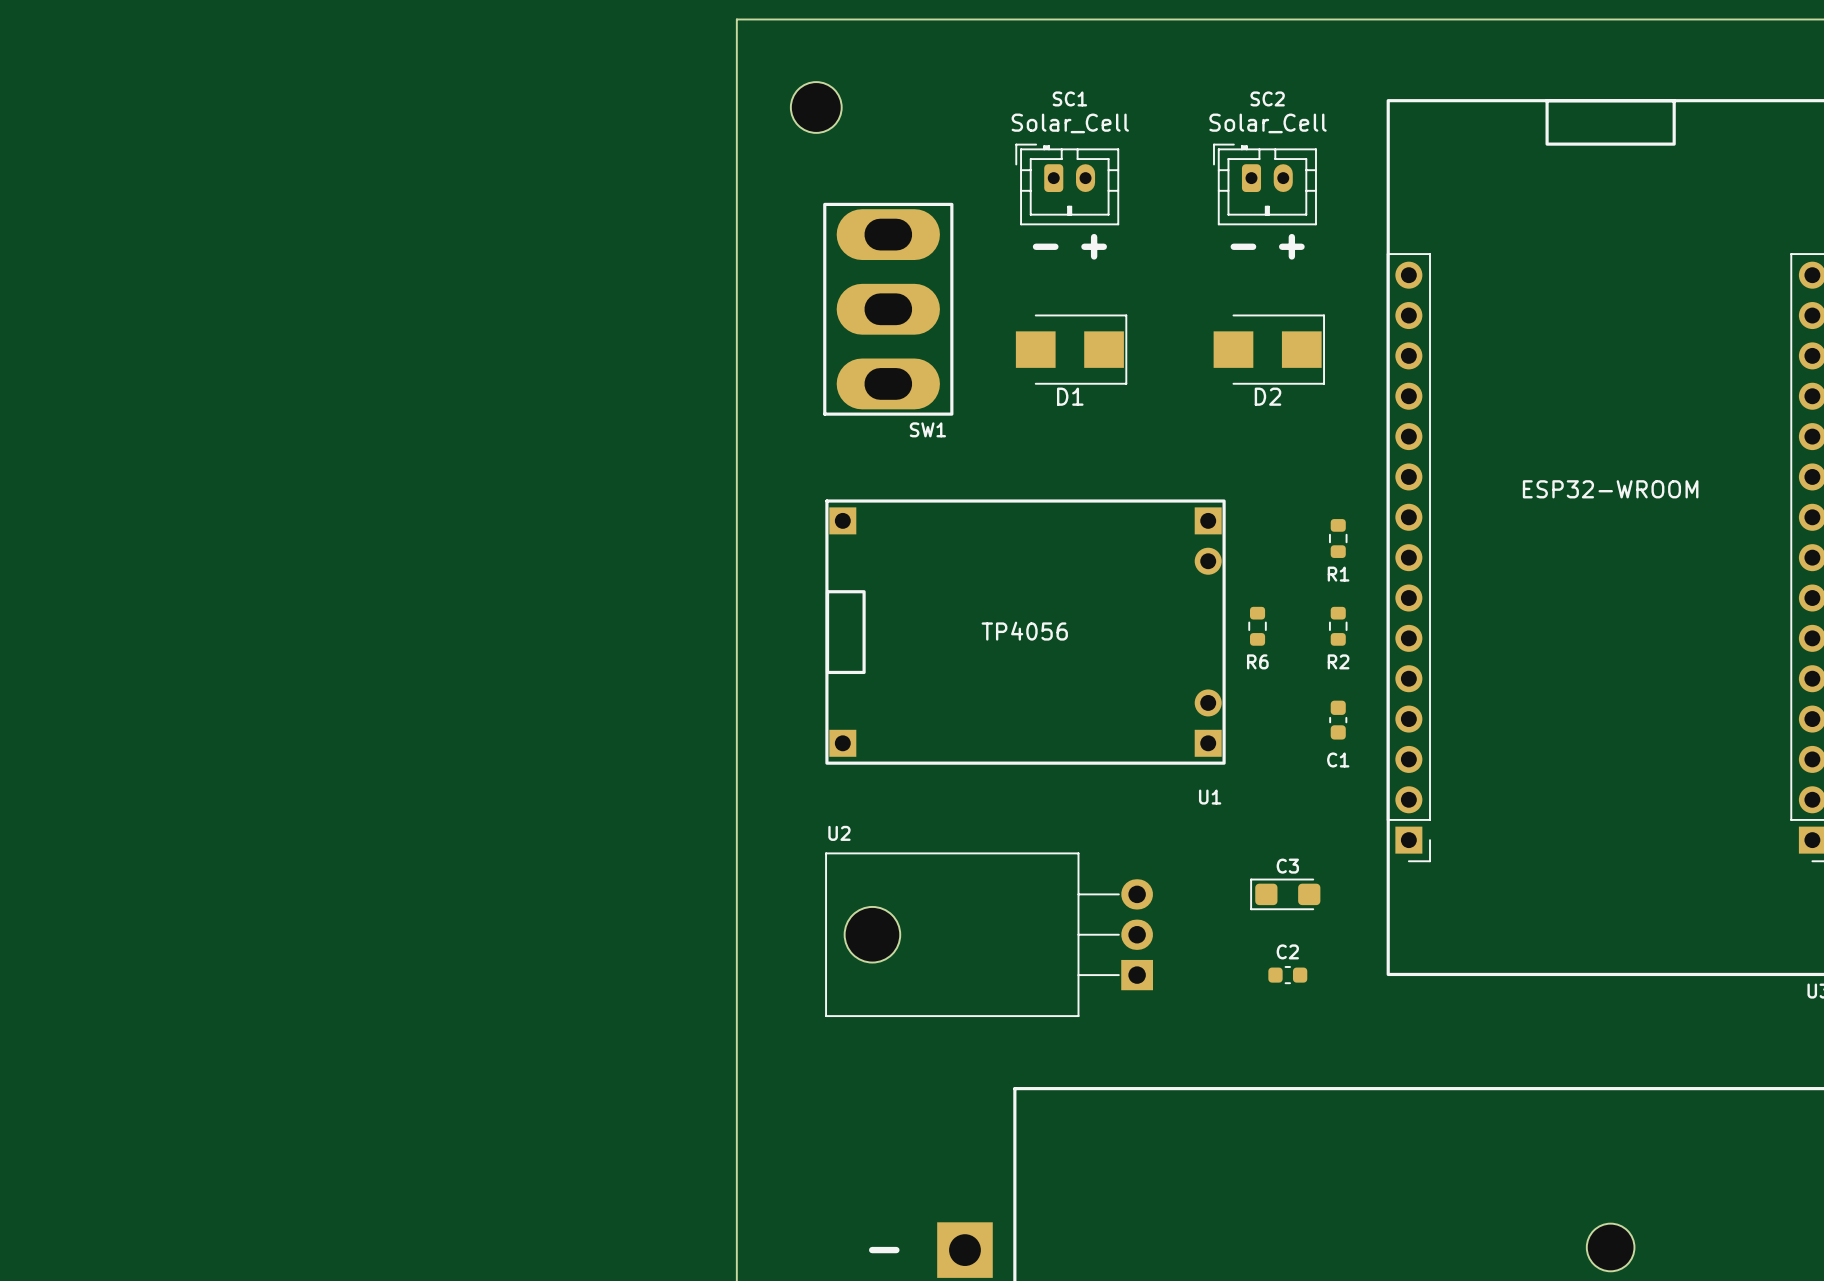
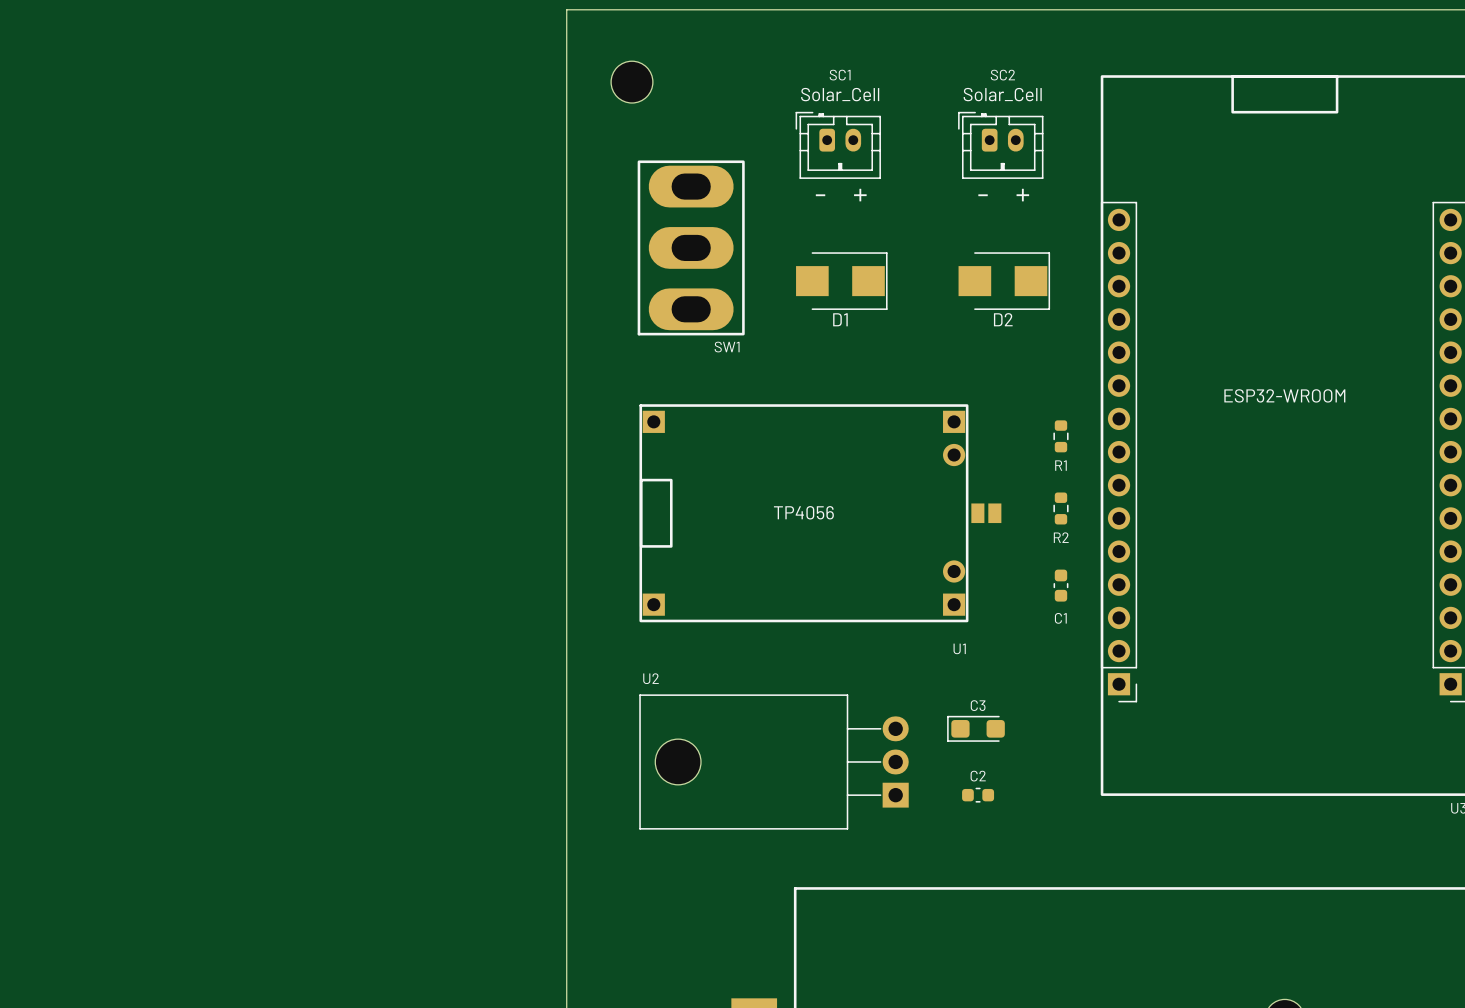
R6: (1257, 626) -> none
part: none -> (986, 513)
C3 position: (1285, 894) -> (975, 728)
C2 position: (1287, 975) -> (978, 795)

